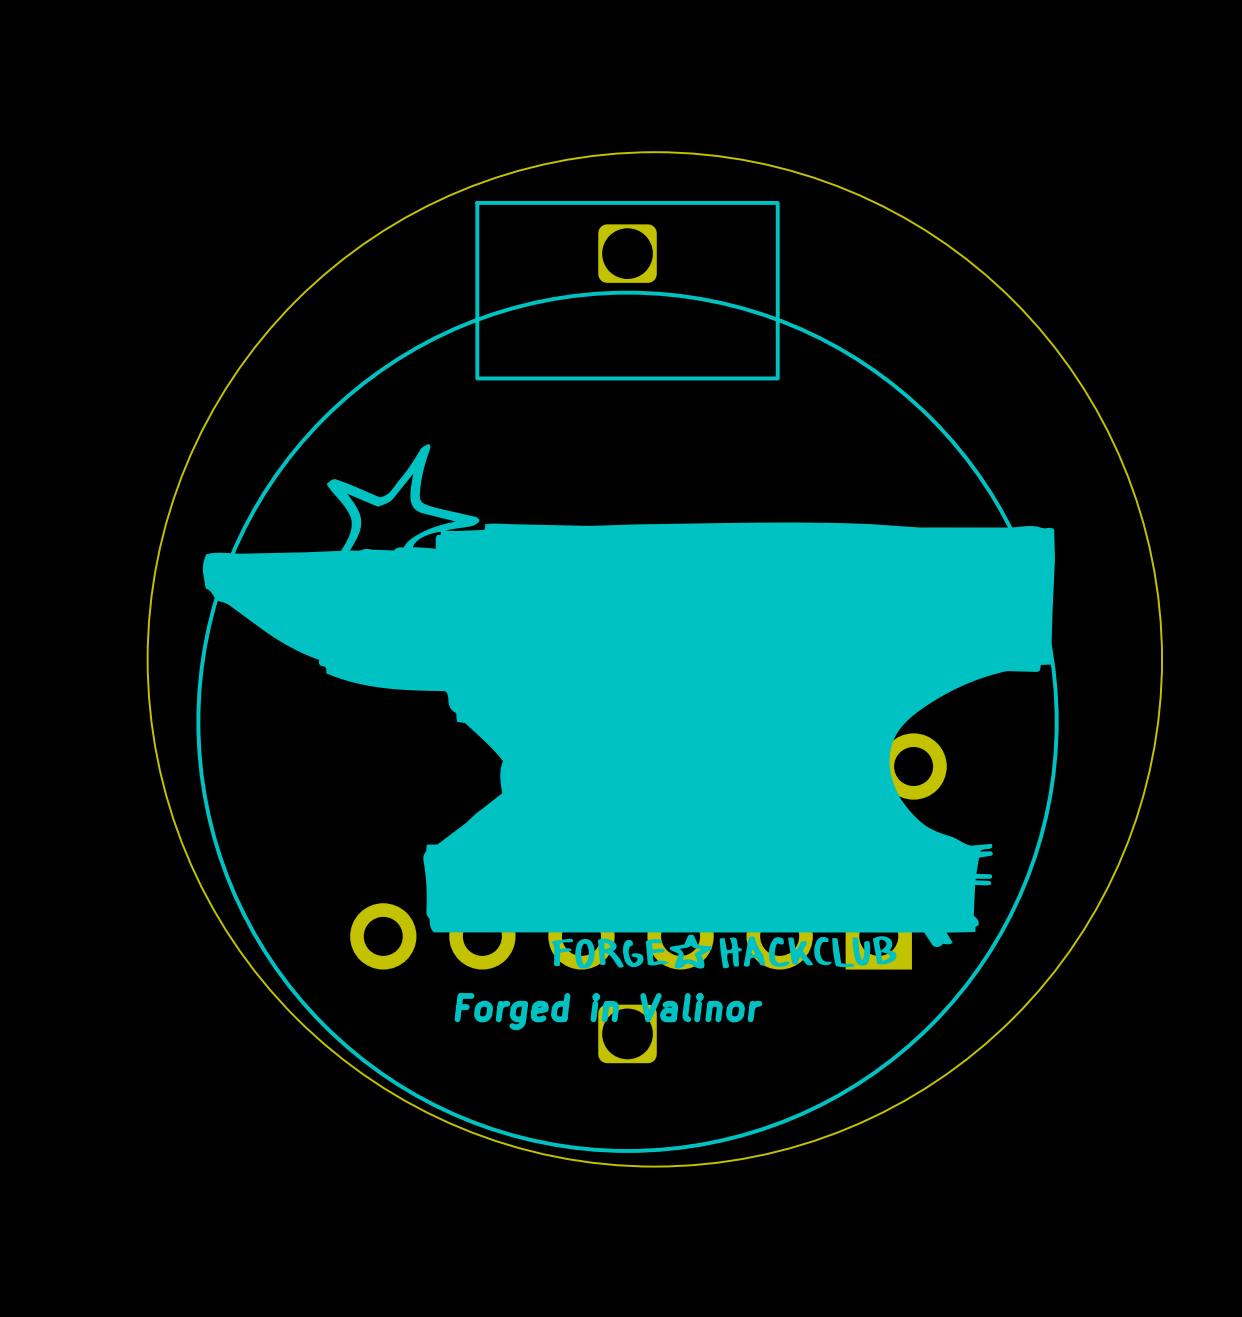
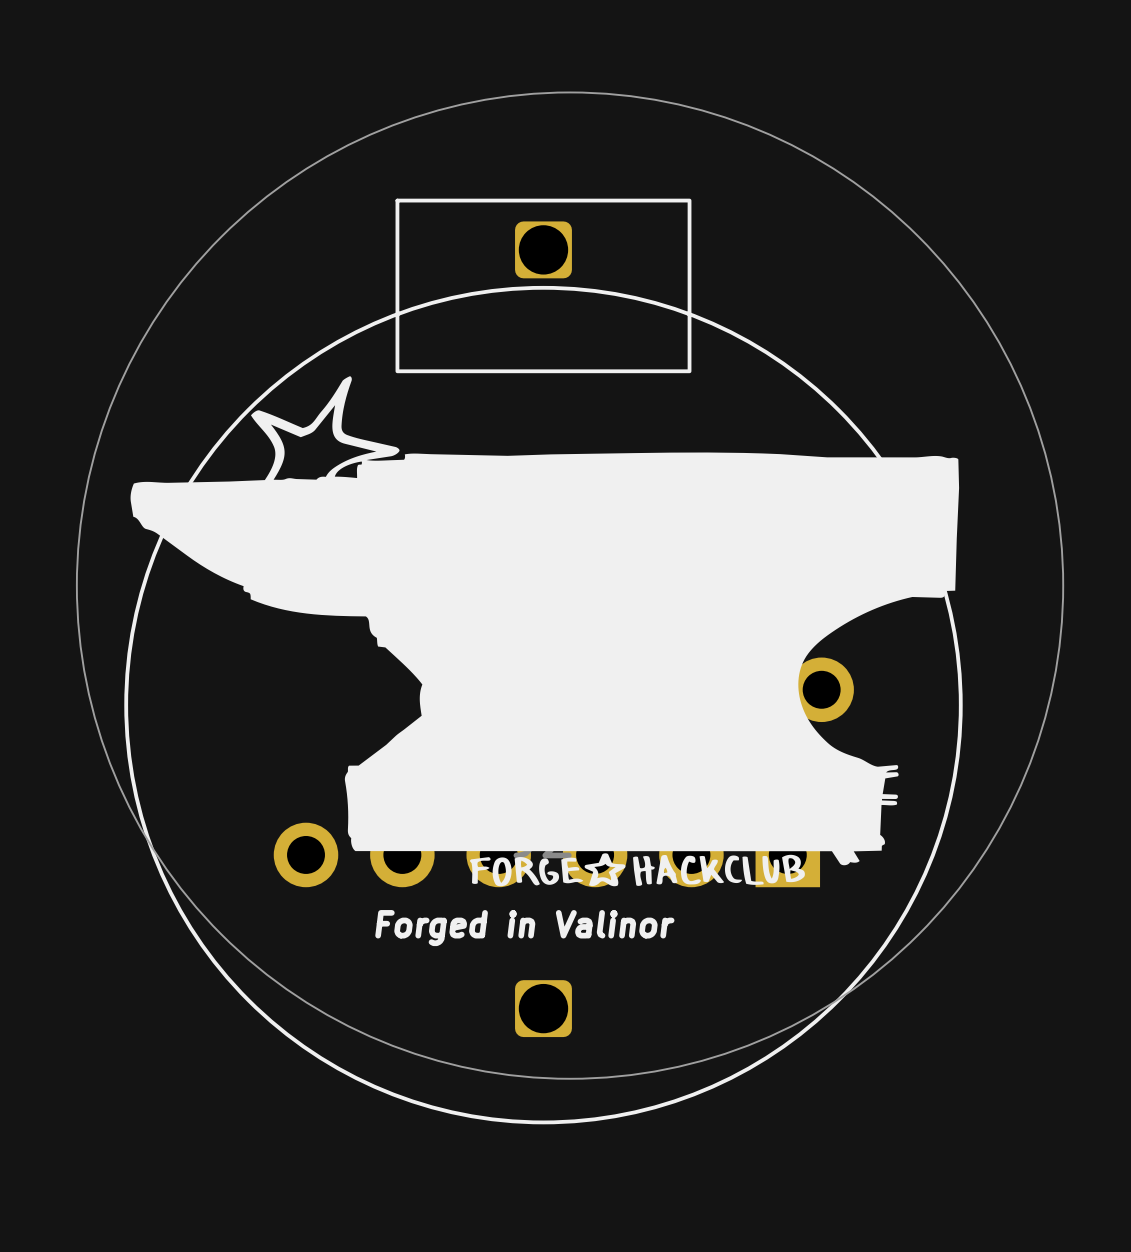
part position: (627, 676) -> (543, 661)

